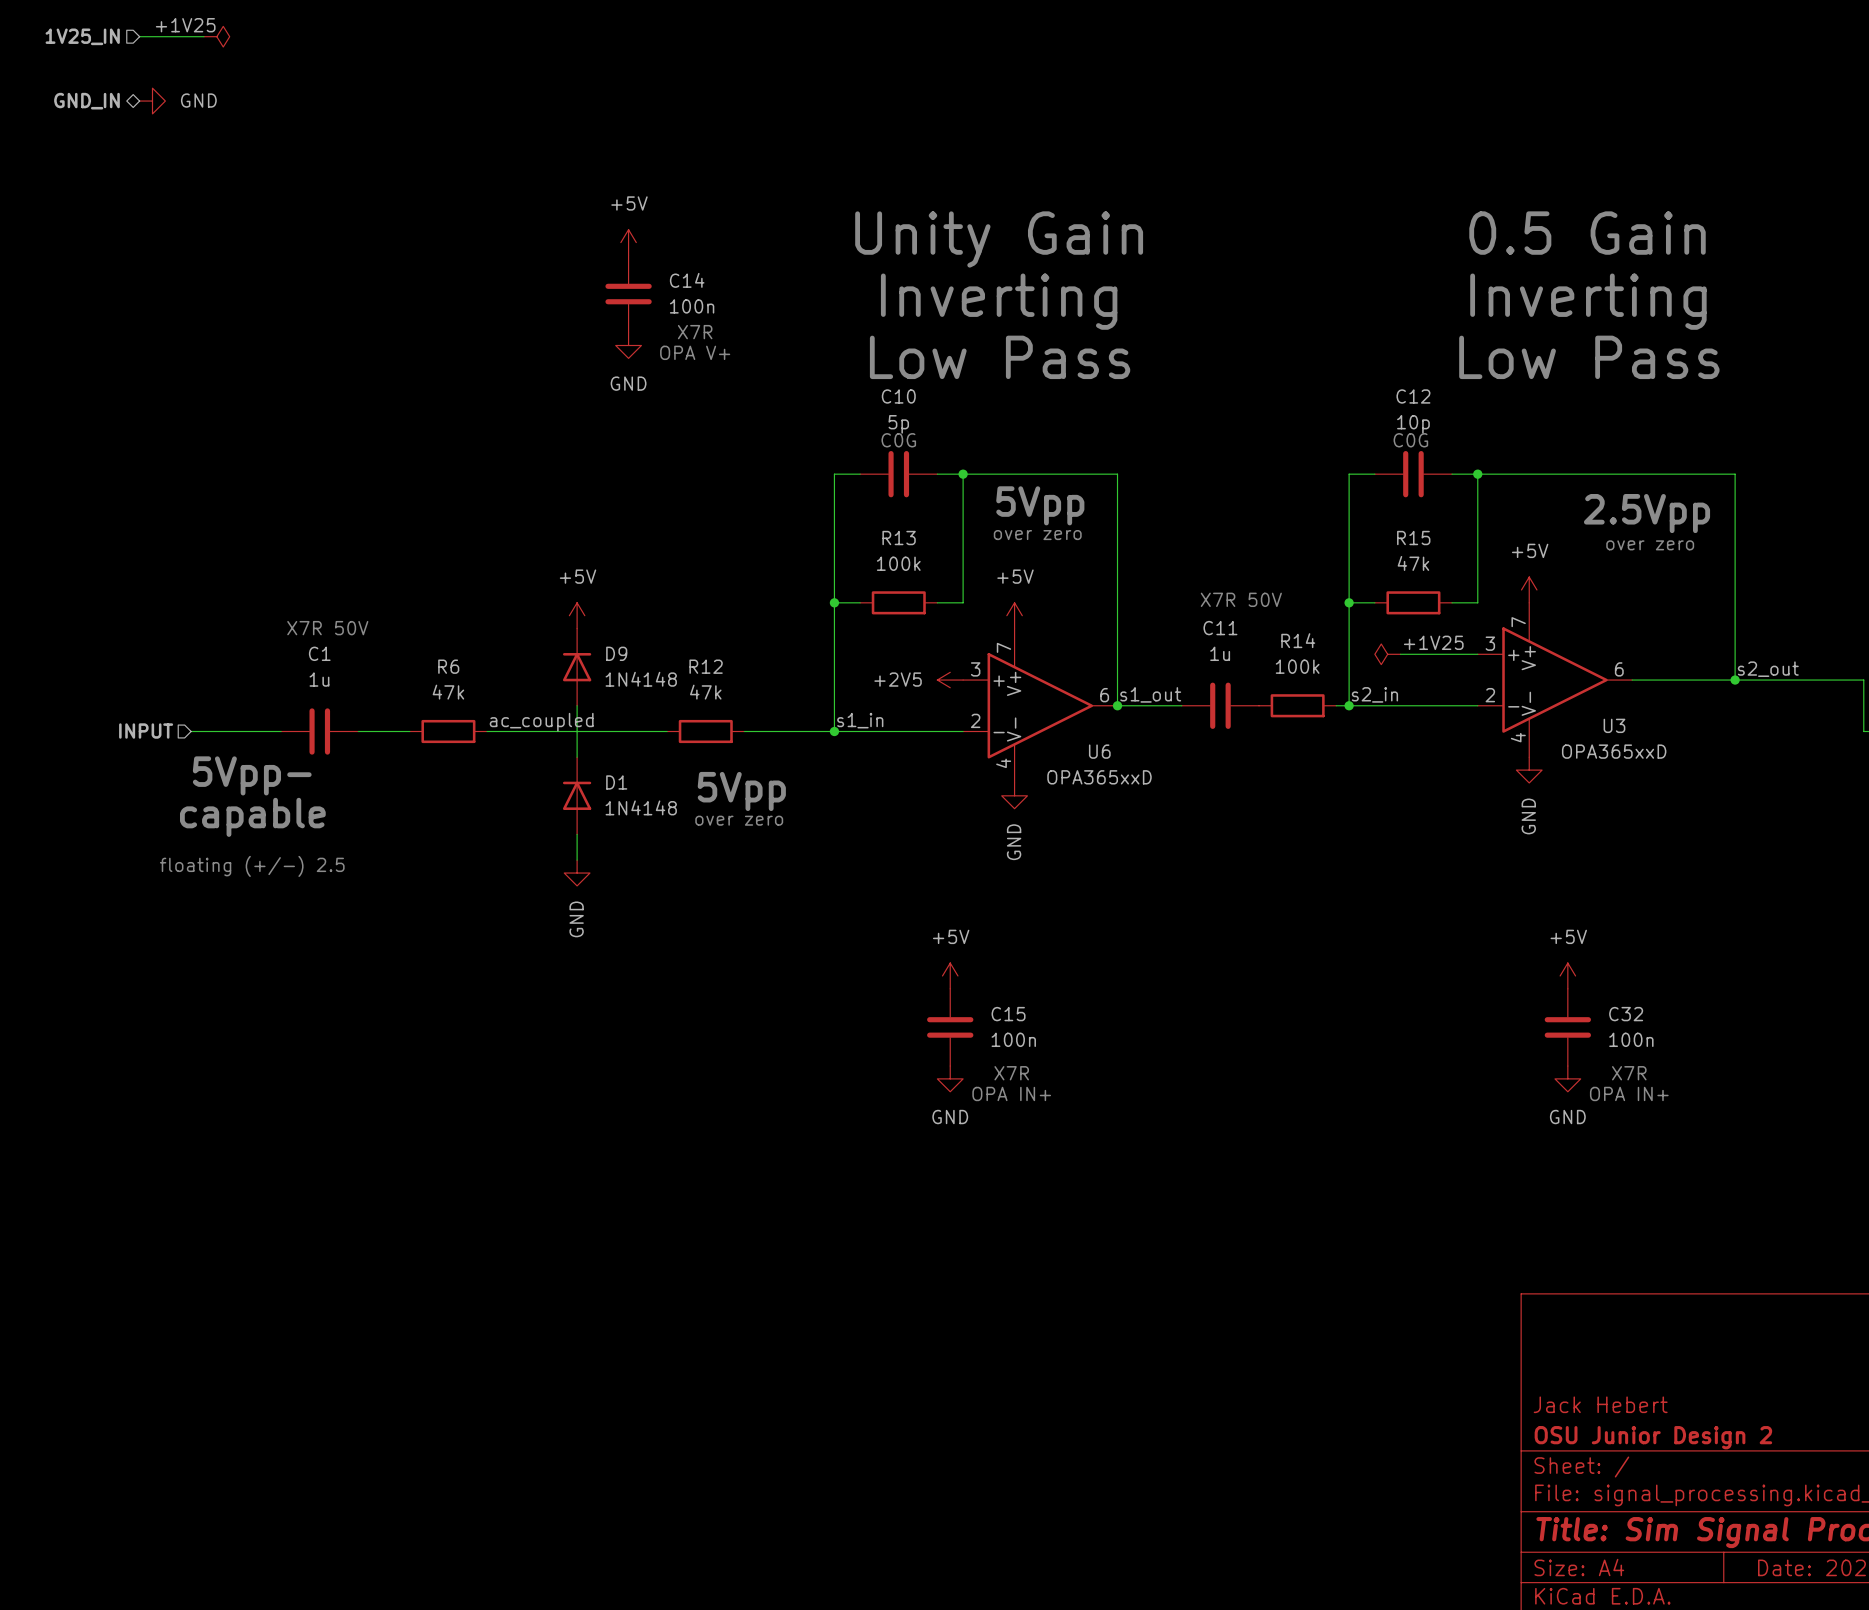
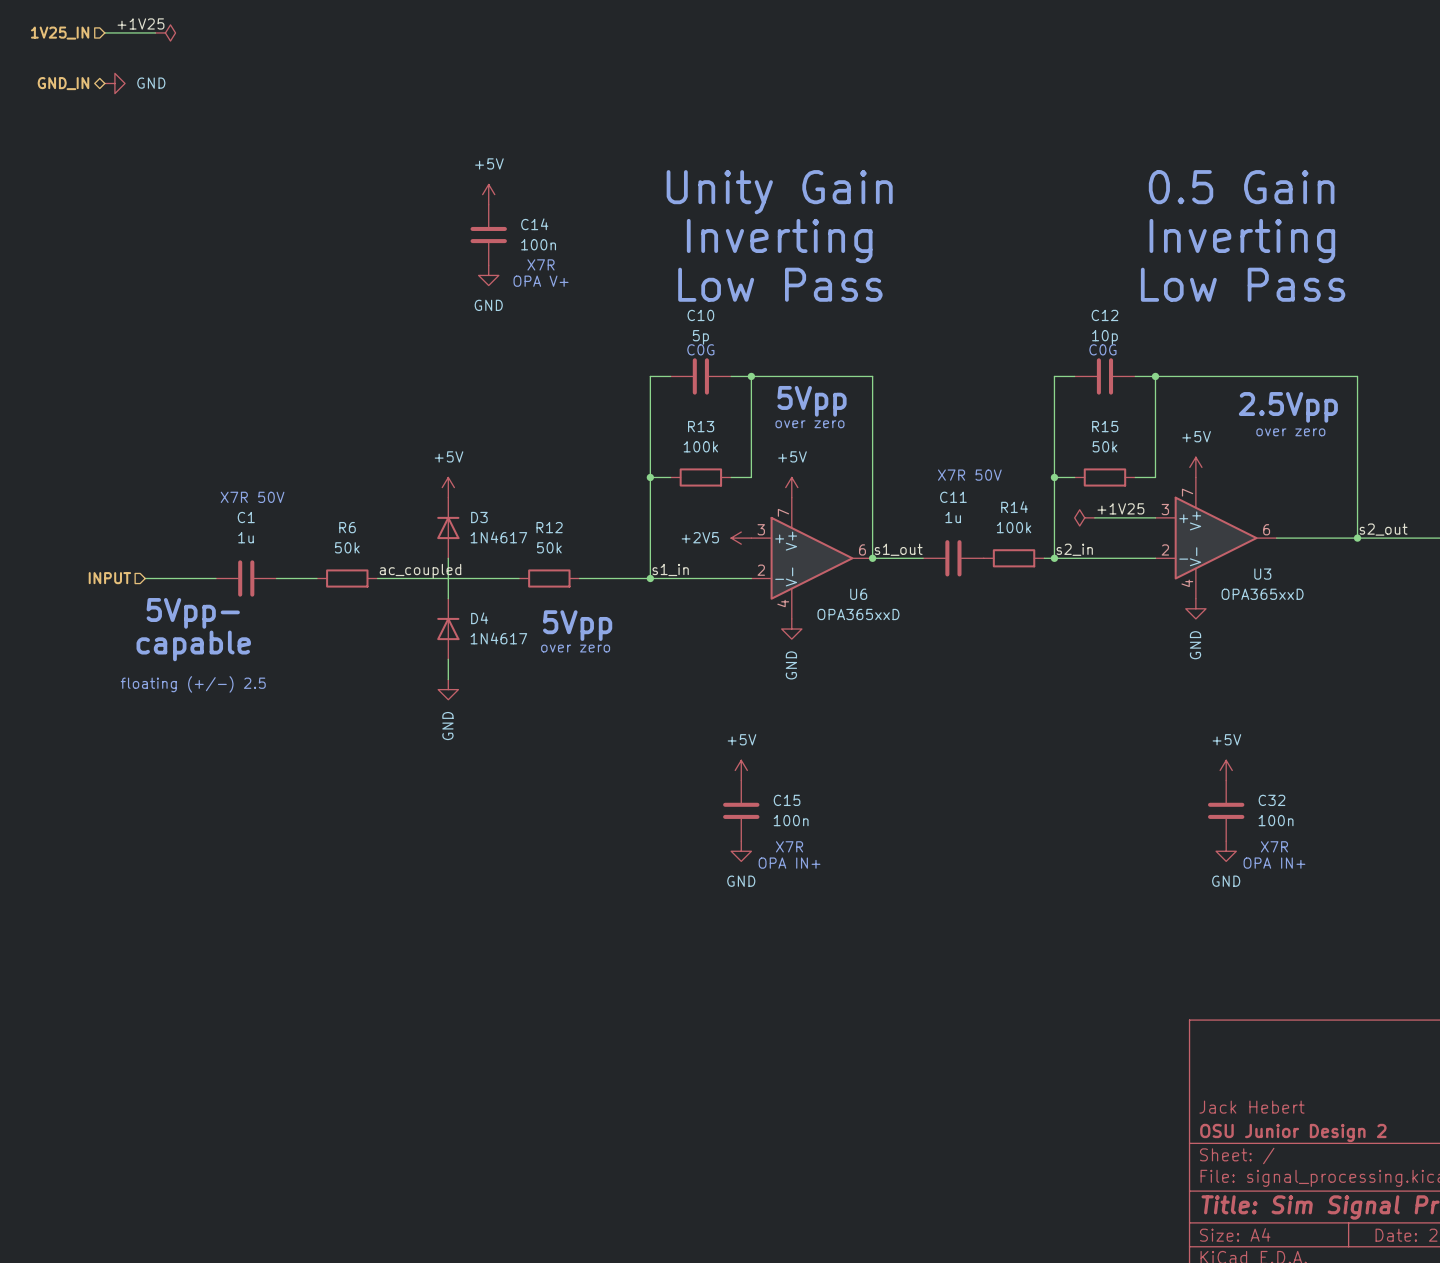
R15 value: 47k (1413, 563) -> 50k (1104, 446)
D9 name: D9 (616, 653) -> D3 (479, 517)
D9 value: 1N4148 (641, 679) -> 1N4617 (498, 537)
R6 value: 47k (448, 692) -> 50k (347, 547)
R12 value: 47k (705, 692) -> 50k (549, 547)
D1 name: D1 (616, 782) -> D4 (479, 618)
D1 value: 1N4148 (641, 807) -> 1N4617 (498, 638)

